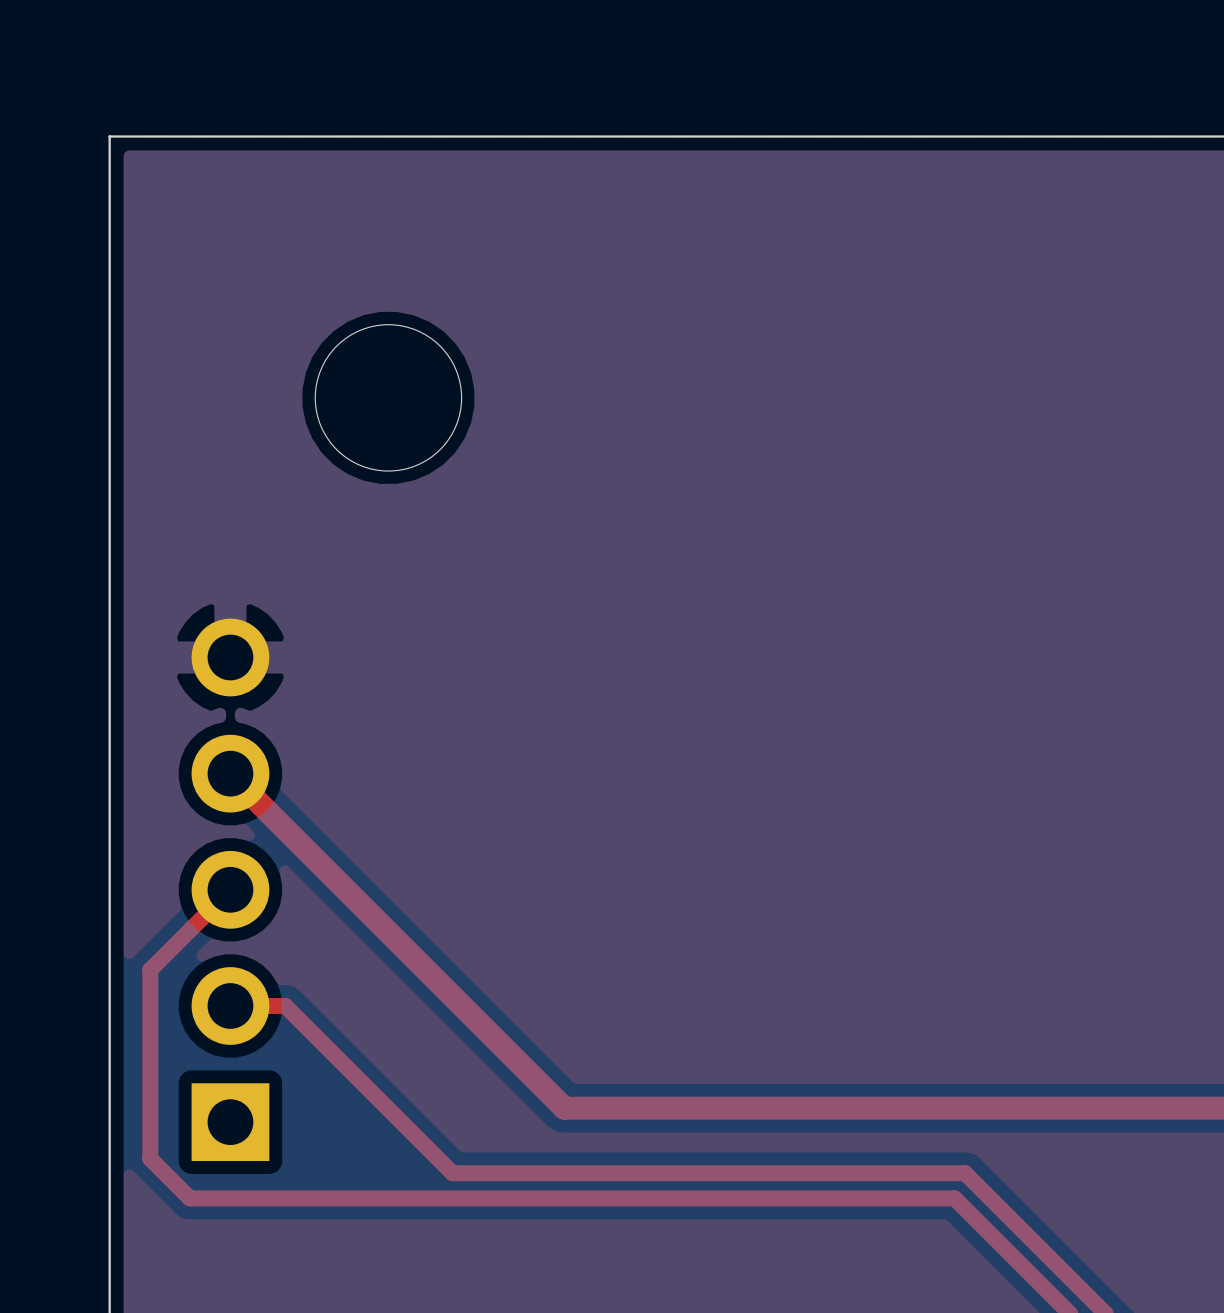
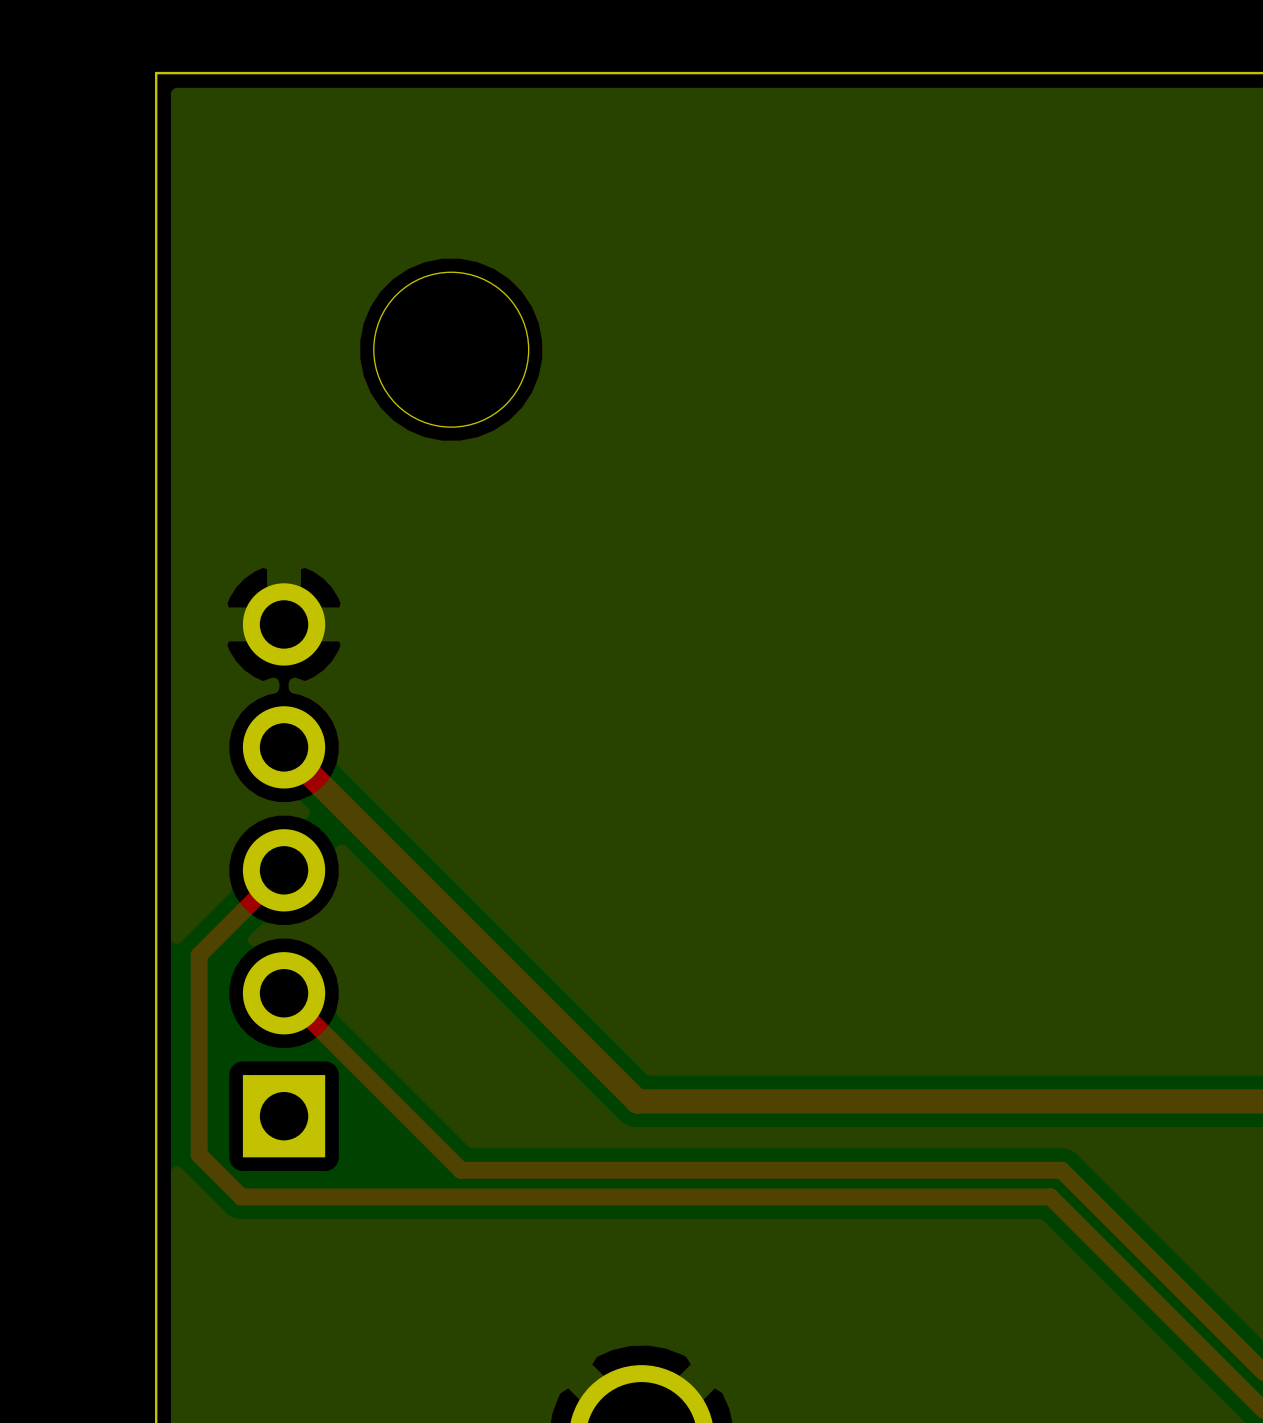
top track: (230, 1005) (285, 1005) (452, 1173) -> (284, 993) (461, 1170) (519, 1170)

